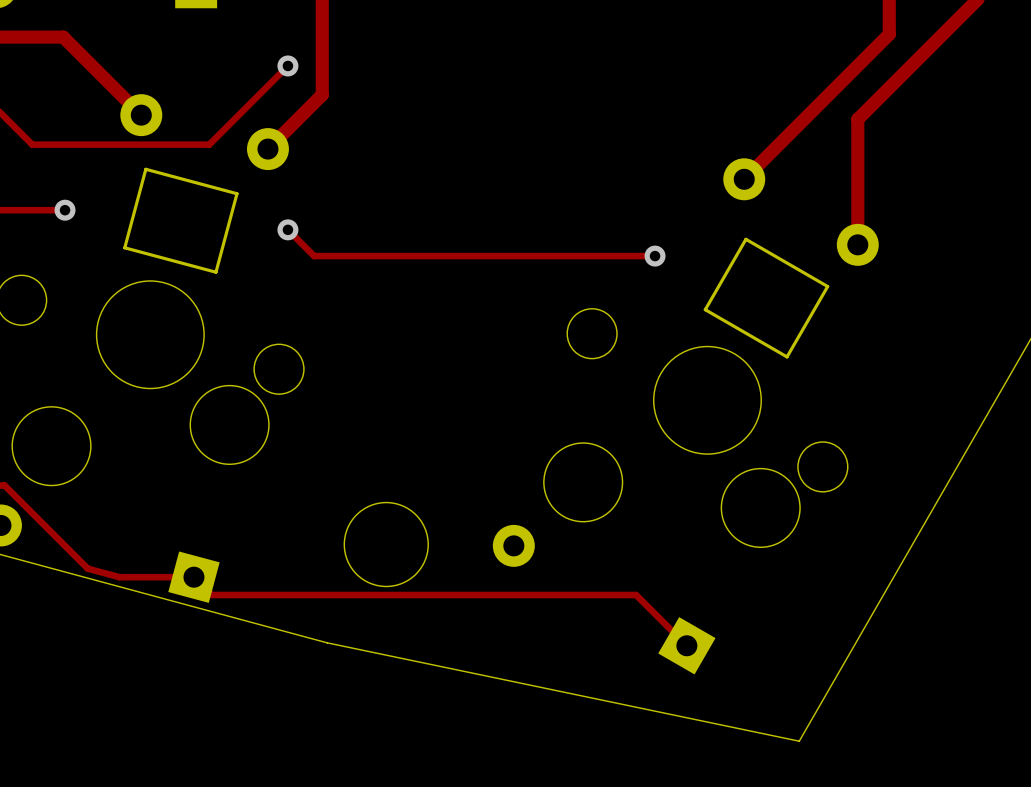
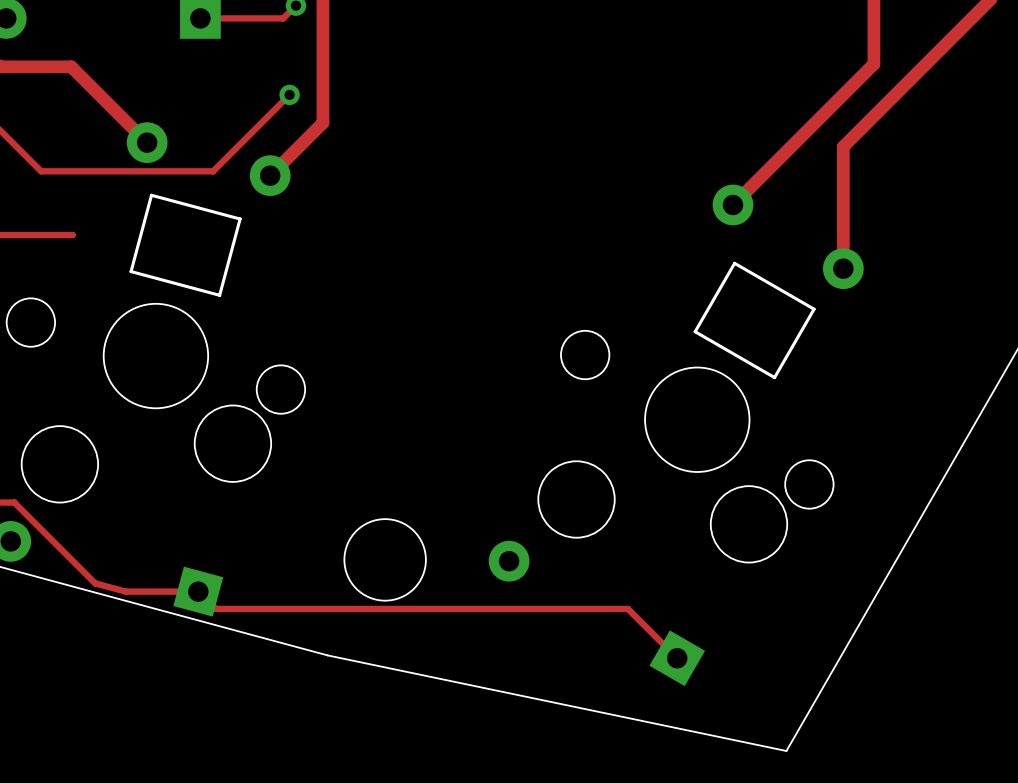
via: (65, 210) -> none
track: (287, 229) (314, 256) (655, 256) -> none
via: (287, 229) -> none
via: (655, 256) -> none

